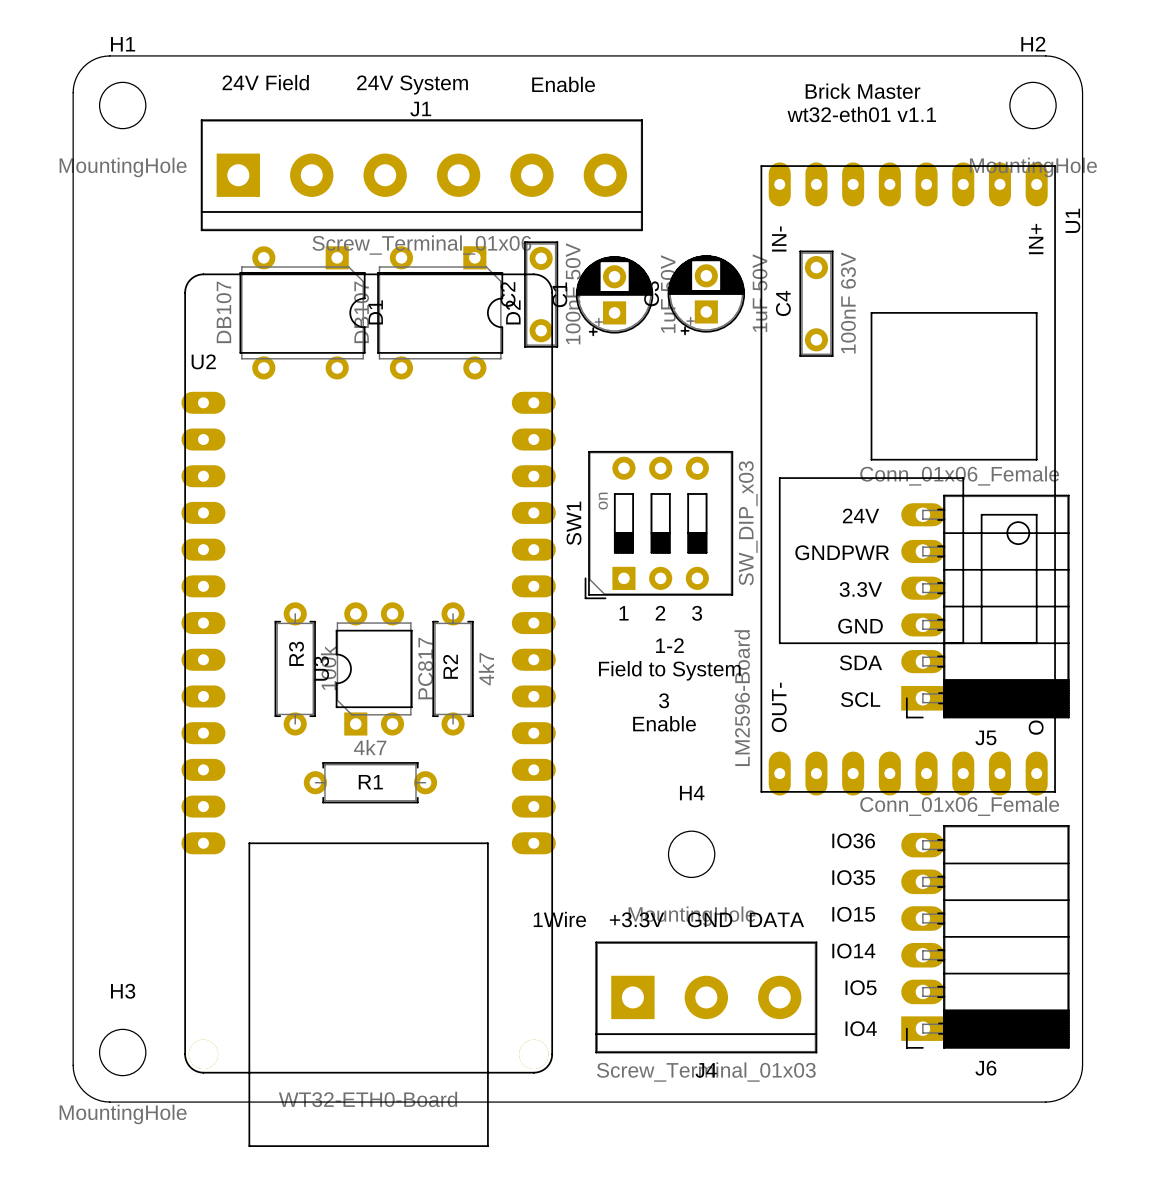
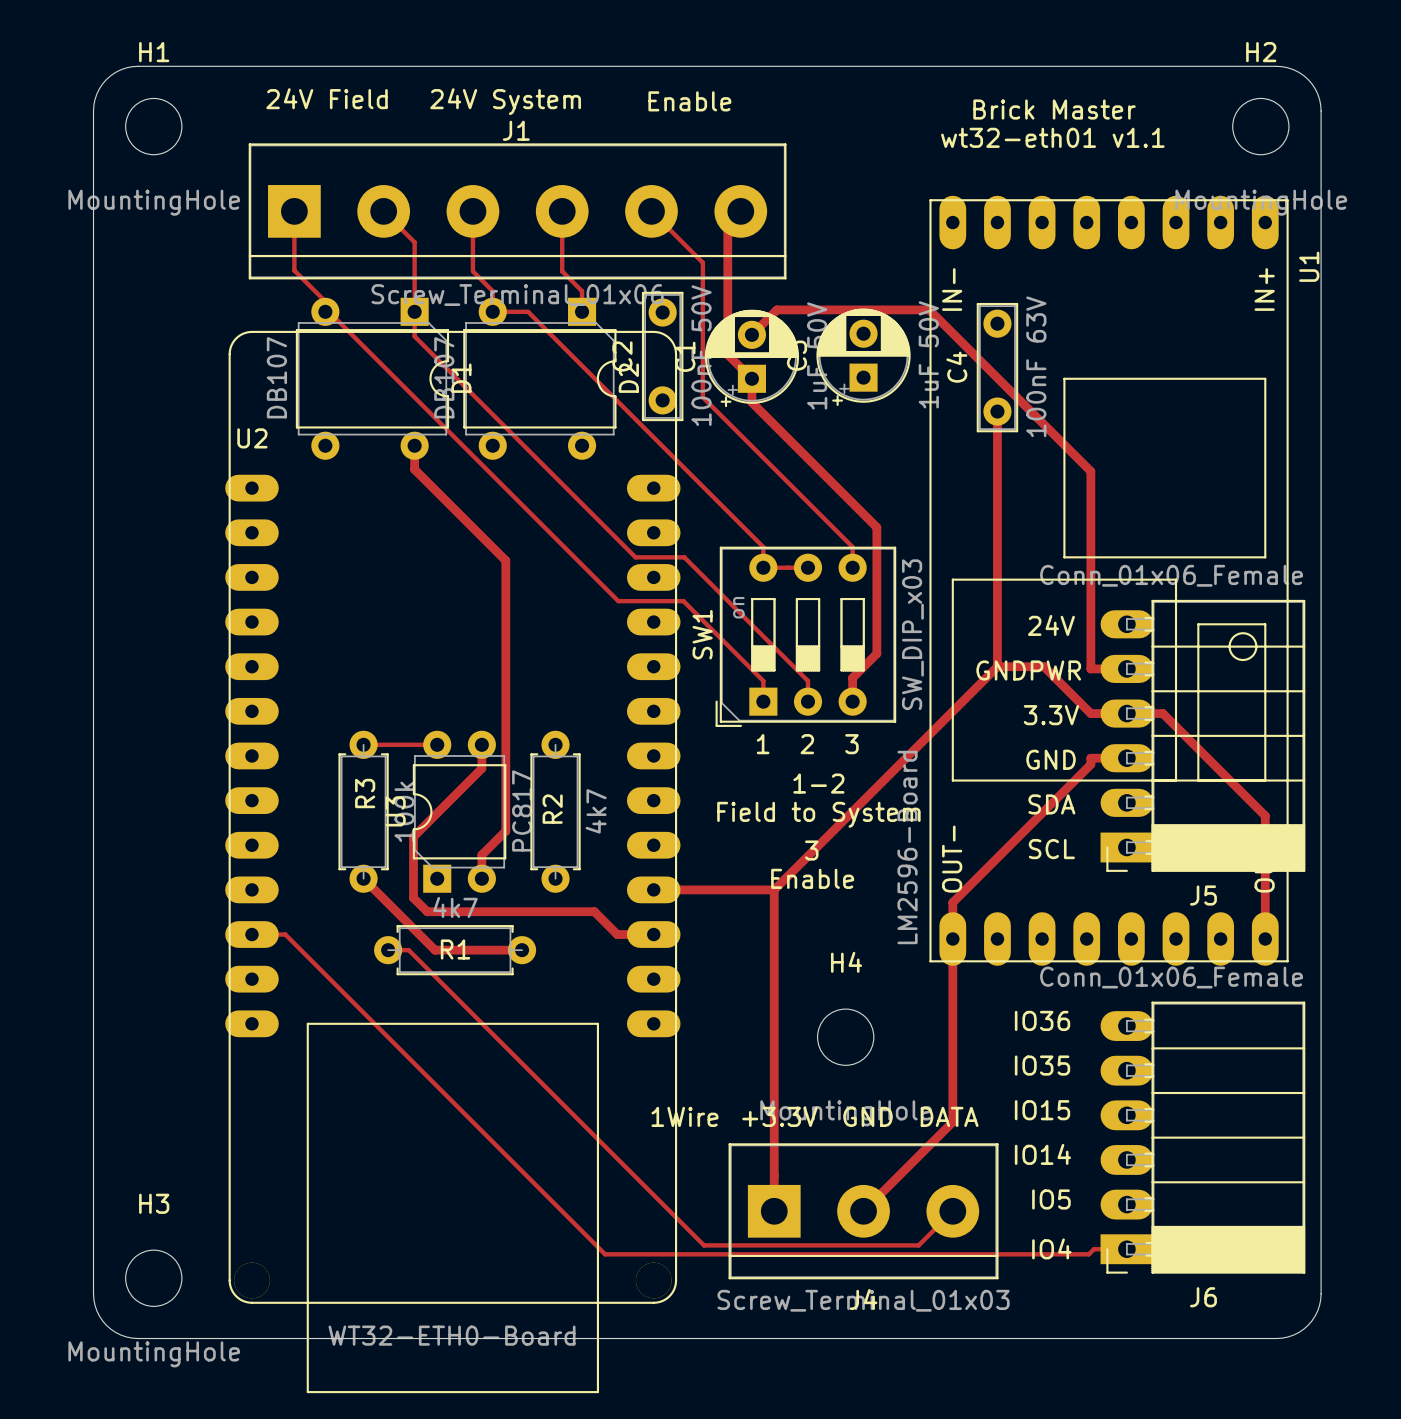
track: none -> (294, 211) (294, 270) (335, 311)
track: none -> (383, 211) (414, 242) (414, 336) (635, 557) (684, 557) (808, 681) (808, 701)
track: none -> (472, 211) (472, 271) (492, 291) (492, 311) (528, 311) (763, 547) (763, 567) (808, 567)
track: none -> (562, 211) (562, 271) (582, 291) (582, 311)
track: none -> (651, 211) (702, 262) (702, 397) (852, 547) (852, 567)
track: none -> (740, 211) (727, 224) (727, 354) (751, 378) (751, 402) (876, 527) (876, 653) (852, 677) (852, 701)
track: none -> (335, 311) (335, 318) (618, 601) (683, 601) (763, 681) (763, 701)
track: none -> (751, 334) (776, 309) (929, 309) (1090, 471) (1090, 668) (1126, 668)
track: none -> (997, 411) (997, 666)
track: none -> (414, 445) (414, 469) (505, 560) (505, 831) (481, 855) (481, 878)
track: none -> (997, 666) (774, 889)
track: none -> (997, 666) (1044, 666) (1090, 713) (1162, 713) (1265, 815) (1265, 939)
track: none -> (363, 744) (437, 744)
track: none -> (481, 744) (481, 768) (413, 836) (413, 897) (427, 911) (594, 911) (617, 934) (653, 934)
track: none -> (1126, 758) (1090, 758) (1090, 764) (952, 902) (952, 1122) (863, 1211)
track: none -> (363, 878) (435, 950) (522, 950)
track: none -> (653, 889) (774, 889)
track: none -> (774, 889) (774, 1211)
track: none -> (251, 934) (285, 934) (605, 1254) (1088, 1254) (1093, 1249) (1126, 1249)
track: none -> (388, 950) (408, 950) (704, 1245) (918, 1245) (952, 1211)

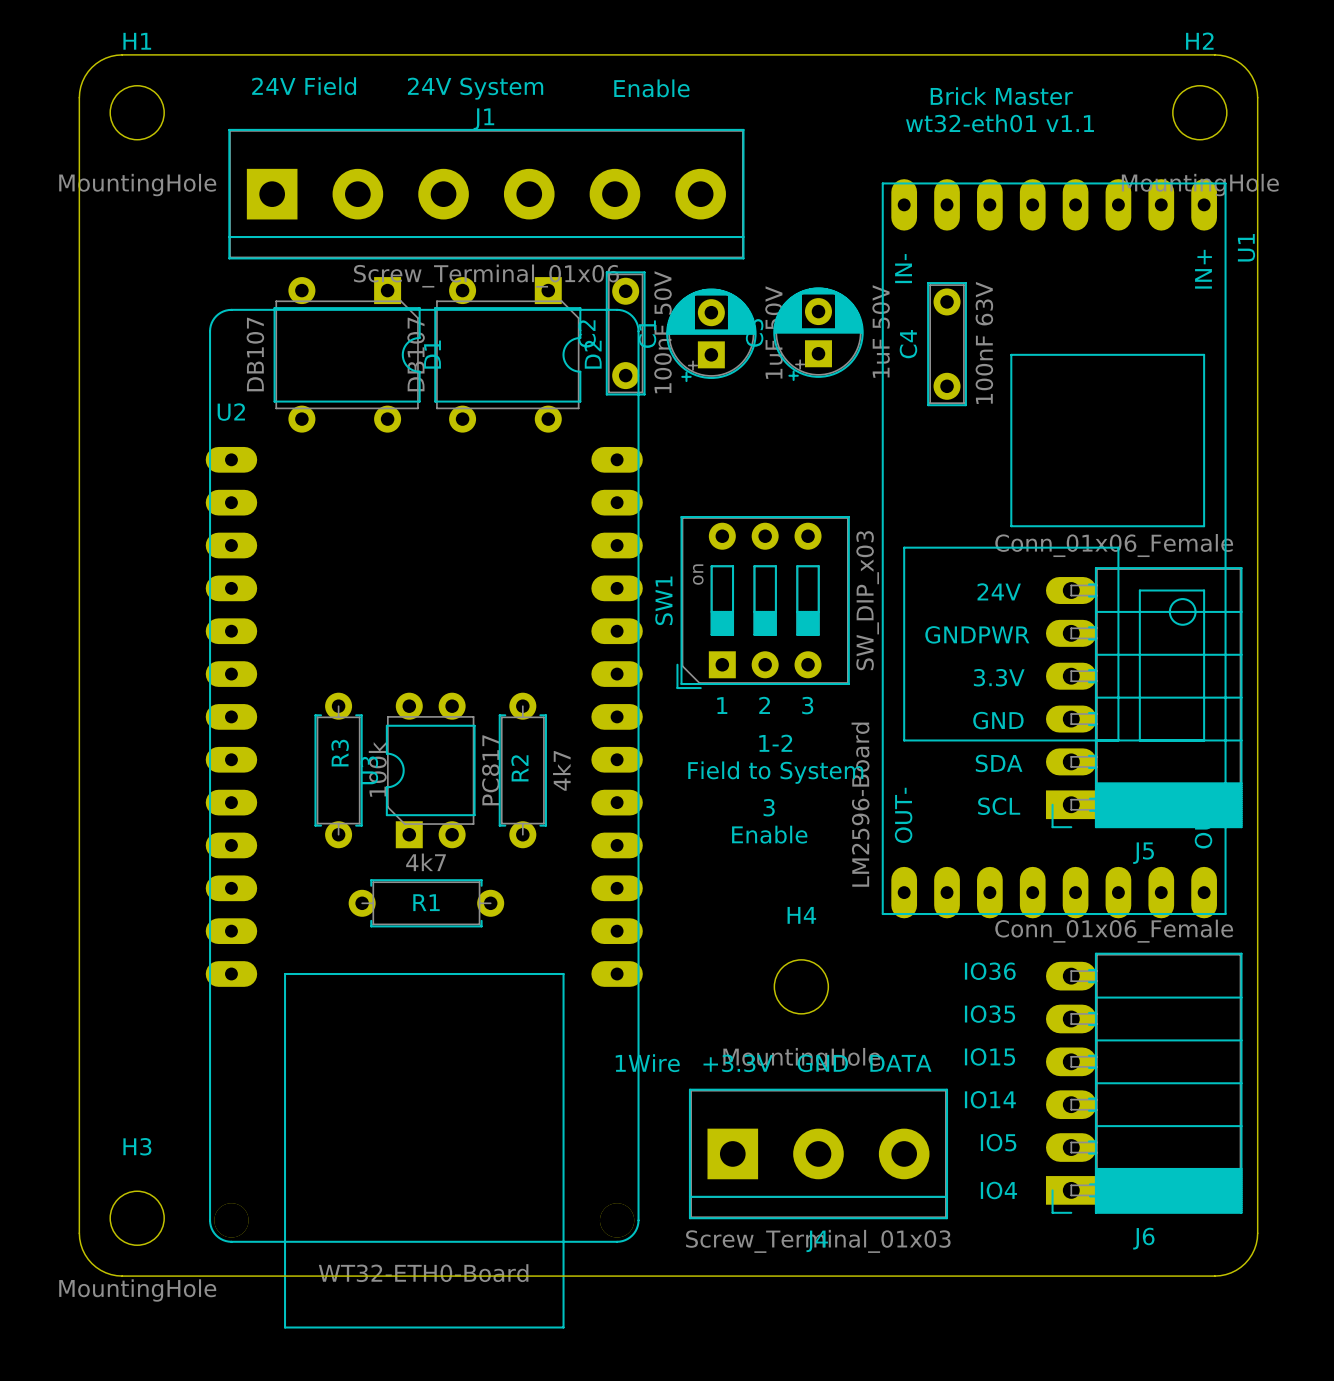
track: (294, 211) (294, 270) (335, 311) -> none
track: (383, 211) (414, 242) (414, 336) (635, 557) (684, 557) (808, 681) (808, 701) -> none
track: (472, 211) (472, 271) (492, 291) (492, 311) (528, 311) (763, 547) (763, 567) (808, 567) -> none
track: (562, 211) (562, 271) (582, 291) (582, 311) -> none
track: (651, 211) (702, 262) (702, 397) (852, 547) (852, 567) -> none
track: (740, 211) (727, 224) (727, 354) (751, 378) (751, 402) (876, 527) (876, 653) (852, 677) (852, 701) -> none
track: (335, 311) (335, 318) (618, 601) (683, 601) (763, 681) (763, 701) -> none
track: (751, 334) (776, 309) (929, 309) (1090, 471) (1090, 668) (1126, 668) -> none
track: (997, 411) (997, 666) -> none
track: (414, 445) (414, 469) (505, 560) (505, 831) (481, 855) (481, 878) -> none
track: (997, 666) (774, 889) -> none
track: (997, 666) (1044, 666) (1090, 713) (1162, 713) (1265, 815) (1265, 939) -> none
track: (363, 744) (437, 744) -> none
track: (481, 744) (481, 768) (413, 836) (413, 897) (427, 911) (594, 911) (617, 934) (653, 934) -> none
track: (1126, 758) (1090, 758) (1090, 764) (952, 902) (952, 1122) (863, 1211) -> none
track: (363, 878) (435, 950) (522, 950) -> none
track: (653, 889) (774, 889) -> none
track: (774, 889) (774, 1211) -> none
track: (251, 934) (285, 934) (605, 1254) (1088, 1254) (1093, 1249) (1126, 1249) -> none
track: (388, 950) (408, 950) (704, 1245) (918, 1245) (952, 1211) -> none

